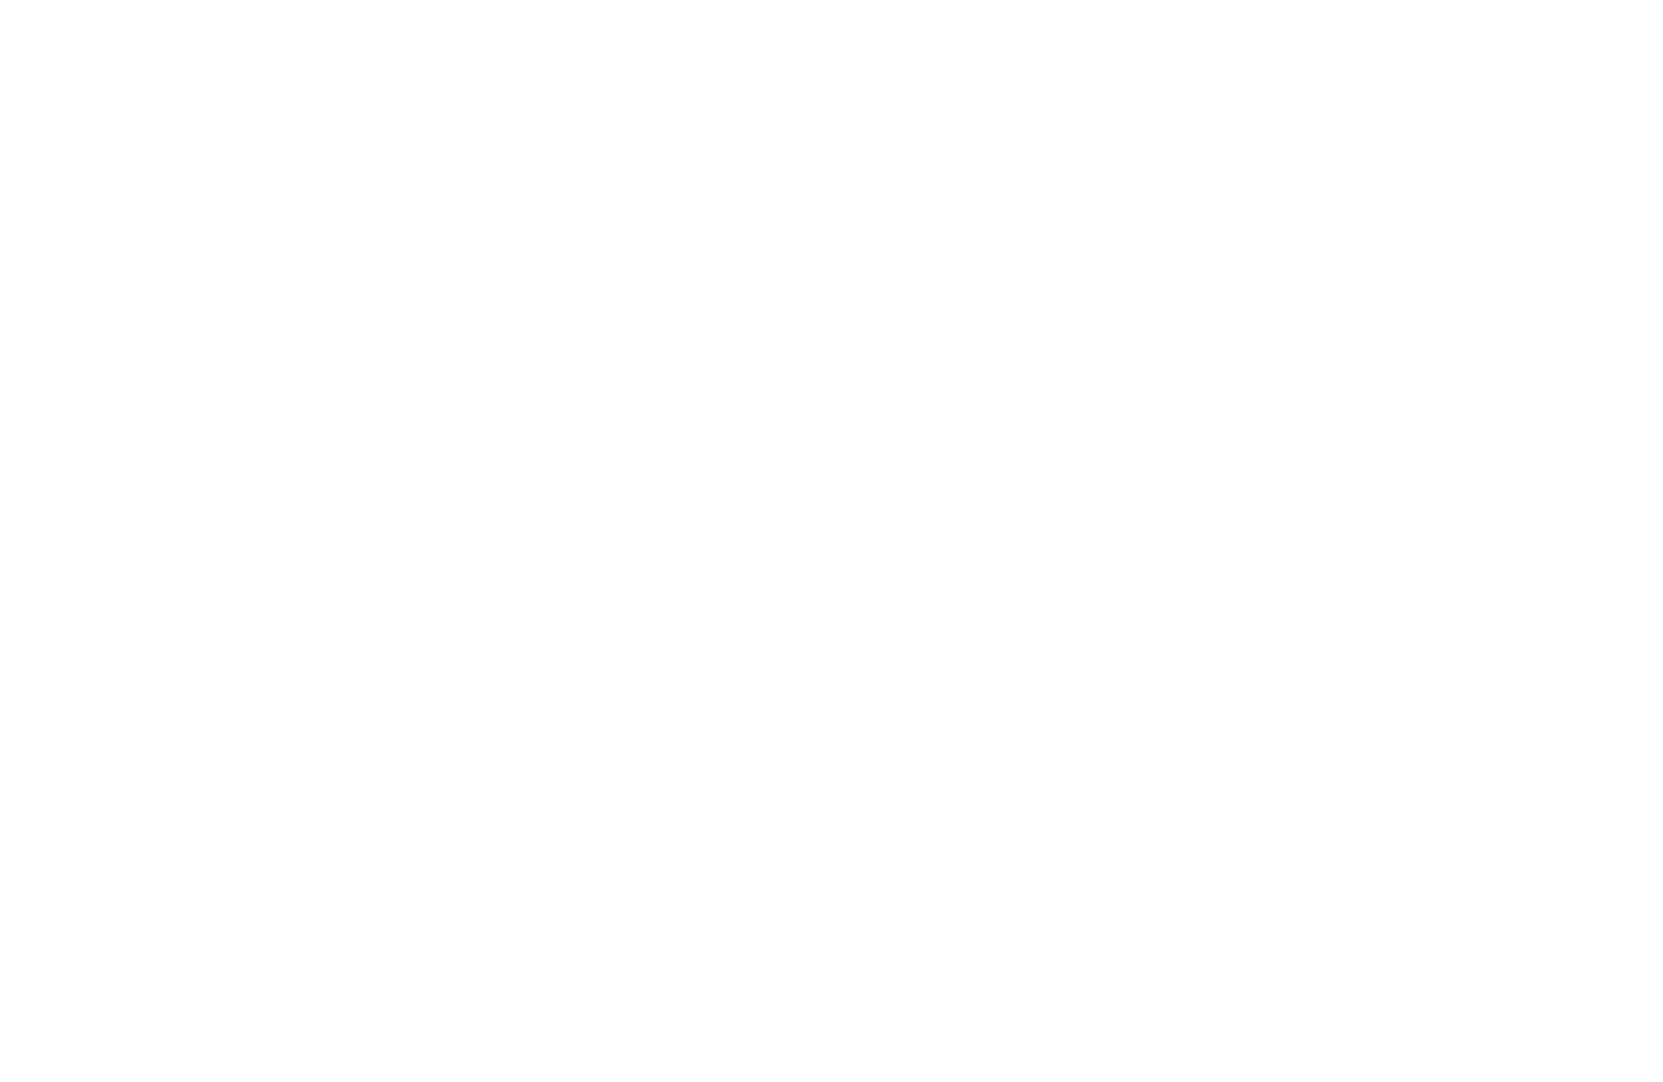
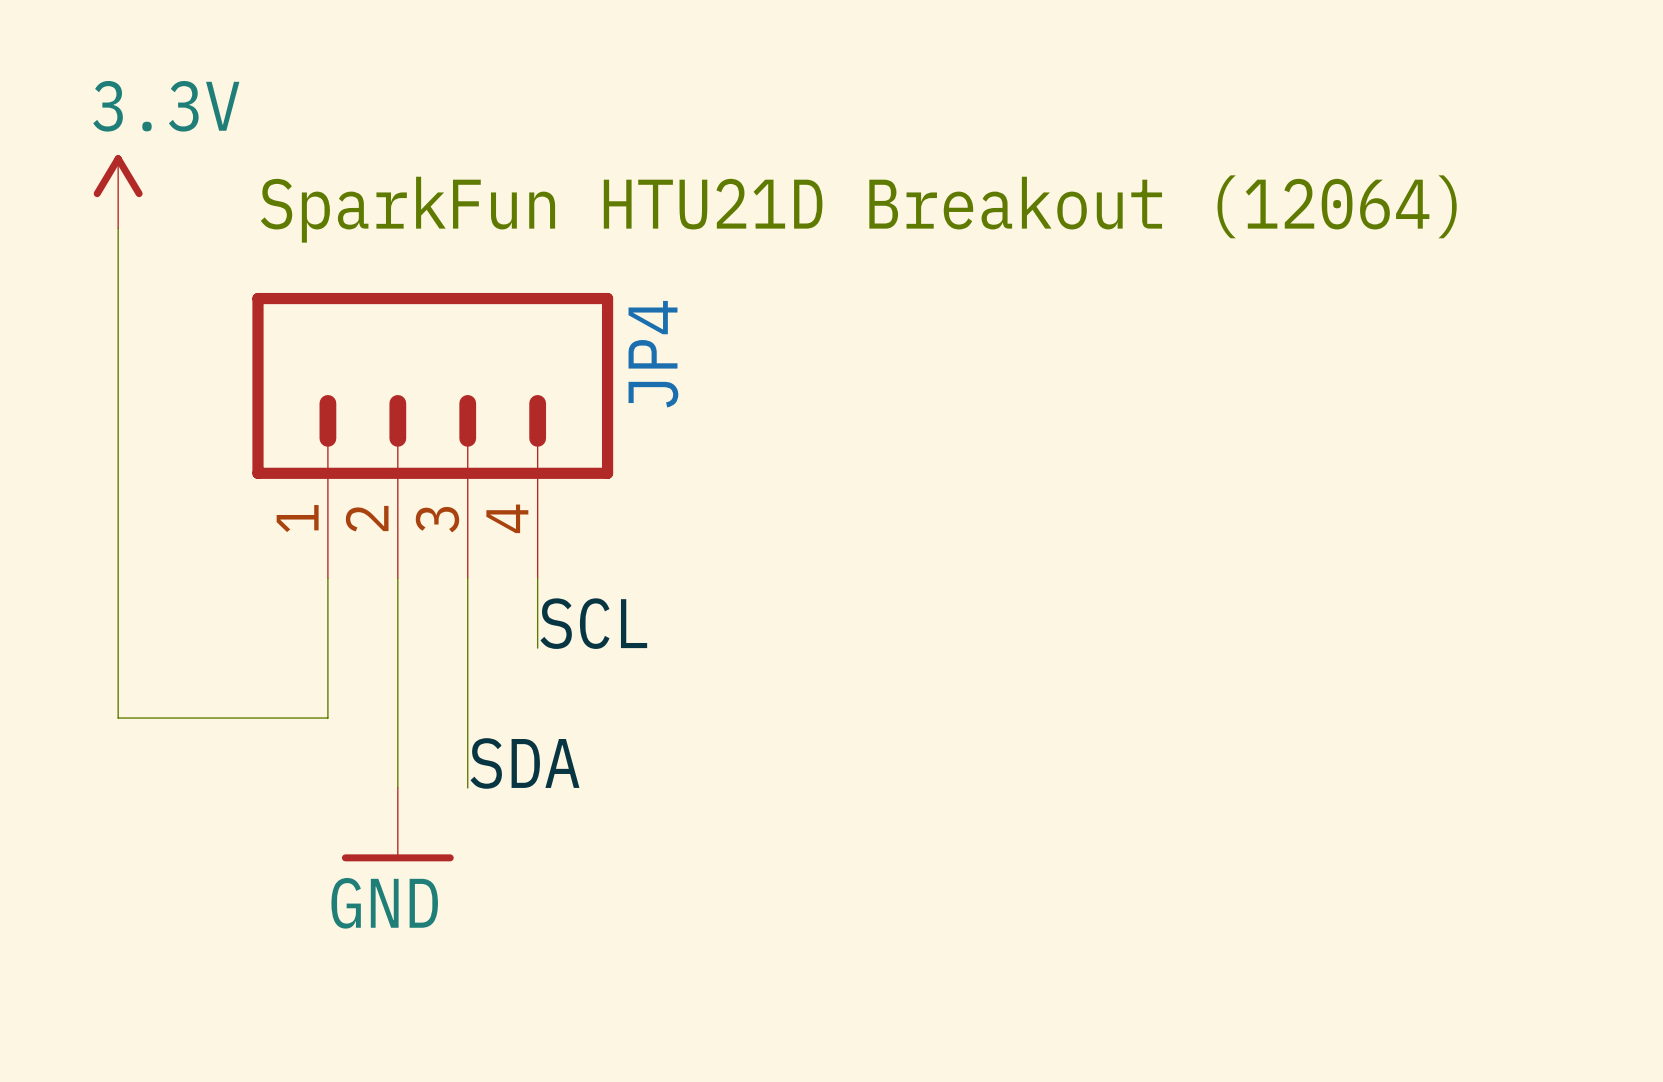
power symbol: none -> 3.3V (118, 191)
text: none -> SparkFun HTU21D Breakout (12064) (858, 208)
wire: none -> (118, 228) (118, 718) (327, 718) (327, 578)
JP4: none -> (432, 435)
wire: none -> (397, 578) (397, 787)
wire: none -> (467, 578) (467, 787)
wire: none -> (537, 578) (537, 648)
label: none -> SCL (593, 623)
label: none -> SDA (525, 763)
power symbol: none -> GND (397, 824)

